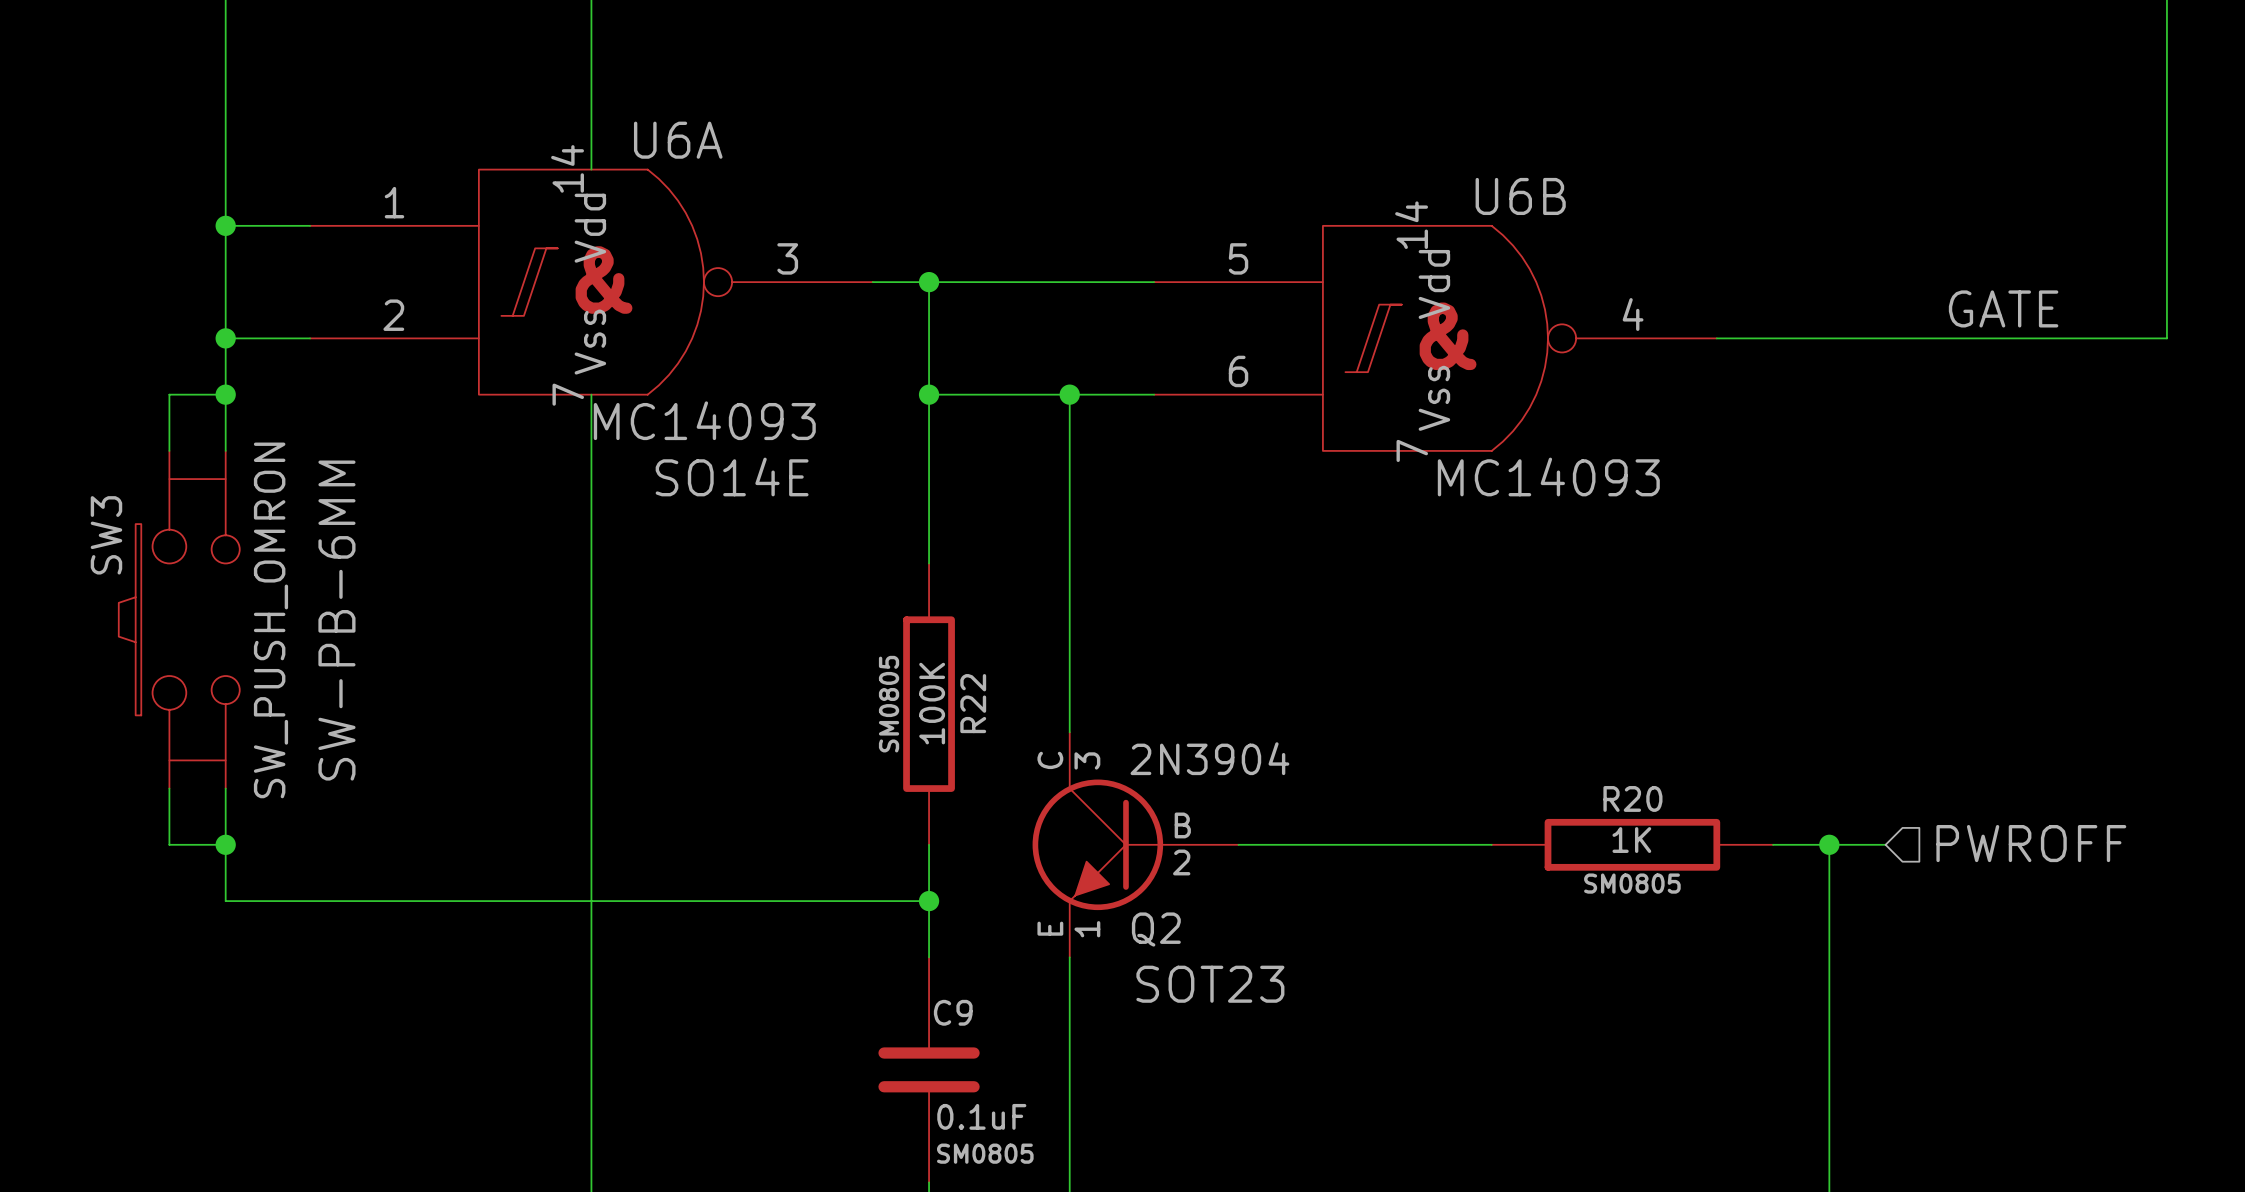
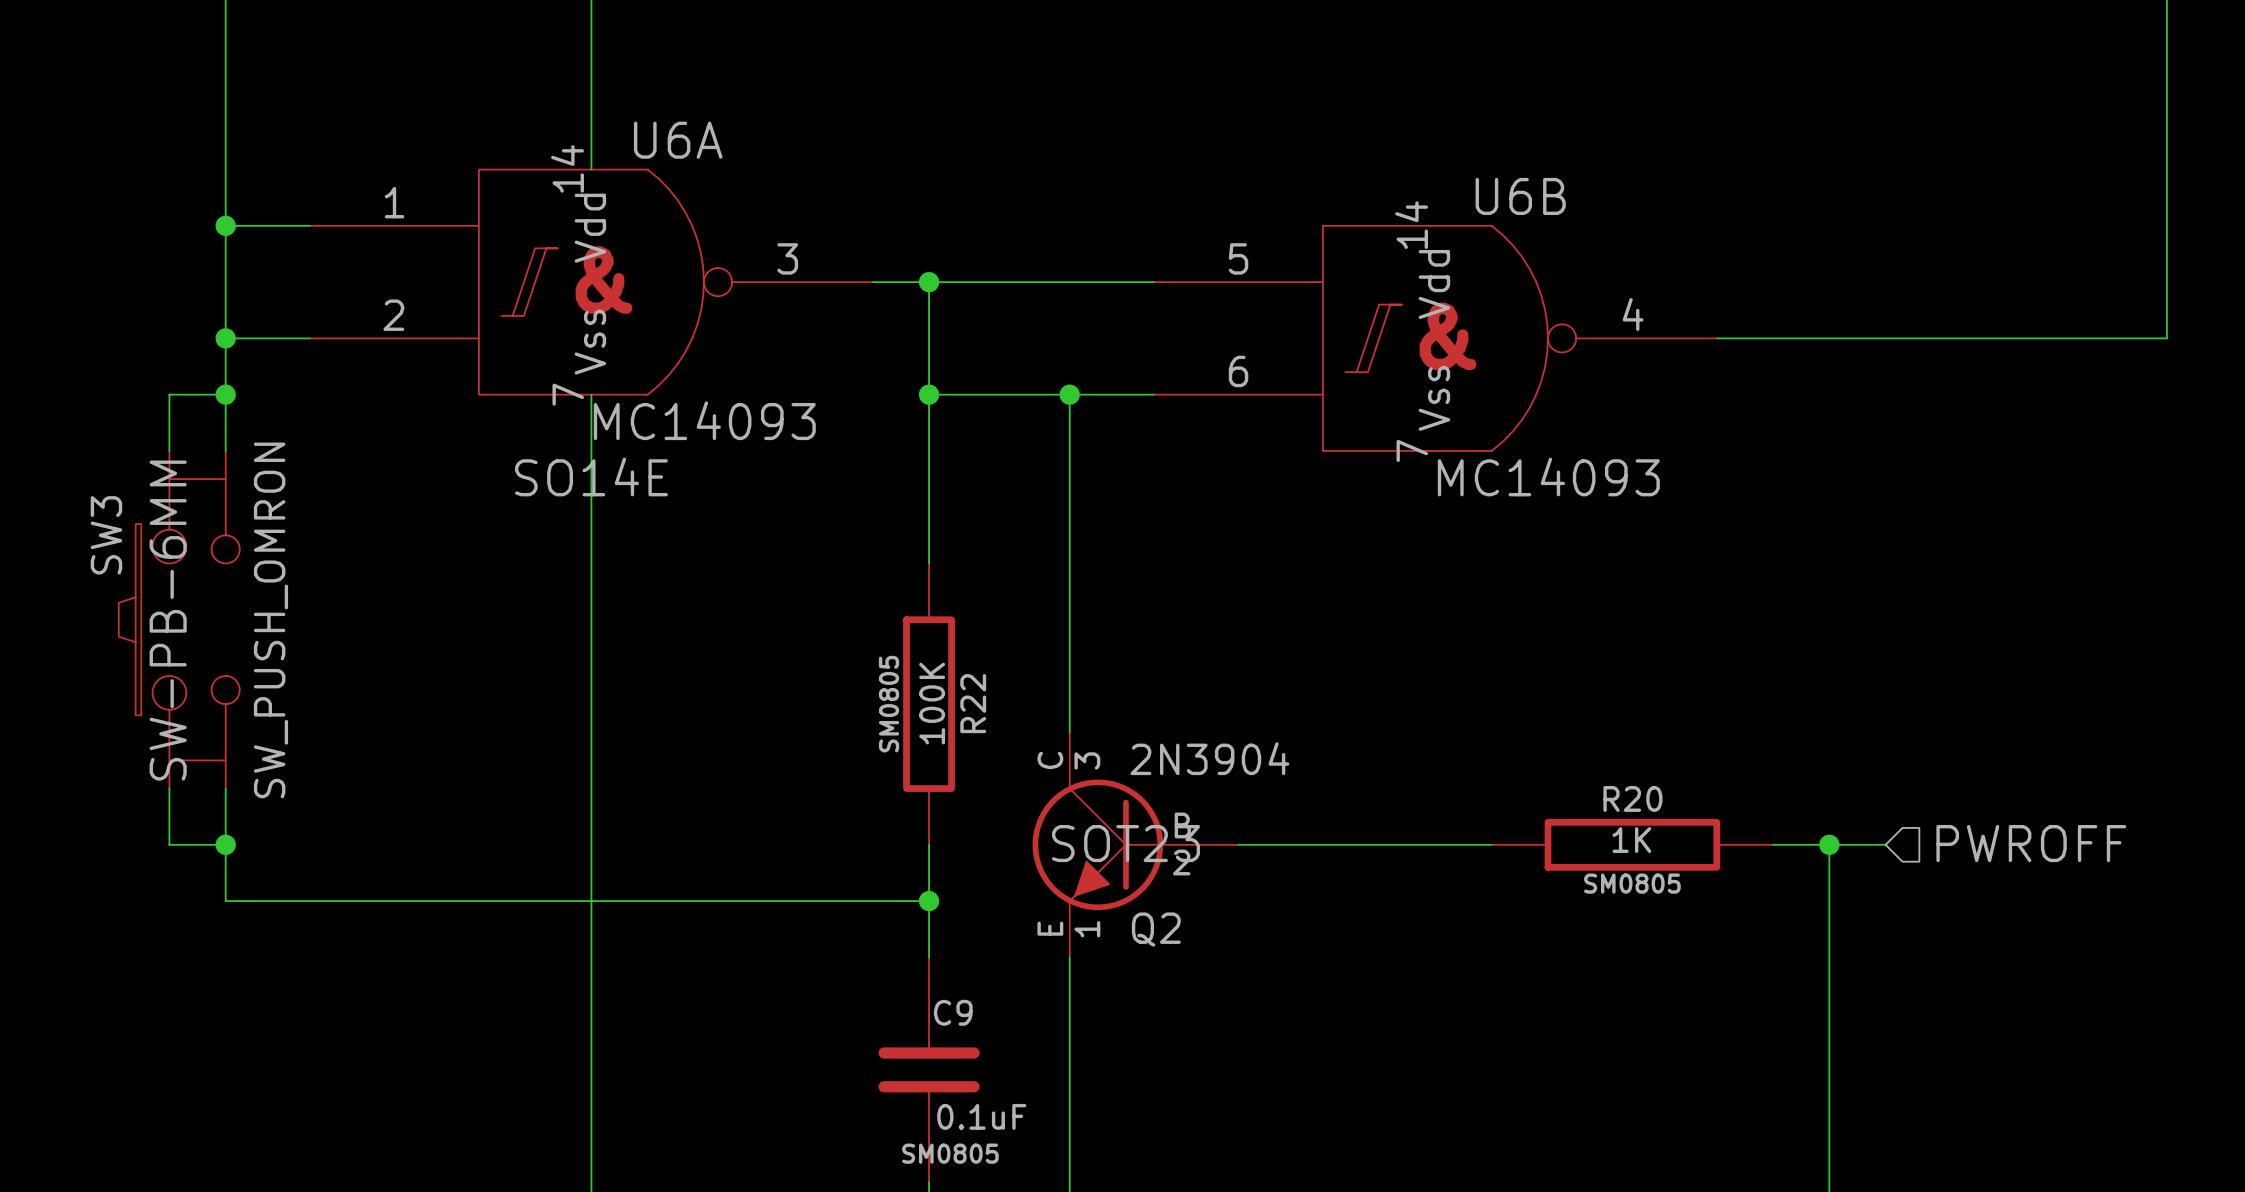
label: GATE (2003, 308) -> none
U6A text position: SO14E (732, 477) -> SO14E (591, 477)
SW3 text position: SW-PB-6MM (336, 620) -> SW-PB-6MM (168, 620)
Q2 text position: SOT23 (1210, 984) -> SOT23 (1125, 843)
C9 text position: SM0805 (985, 1153) -> SM0805 (950, 1153)

